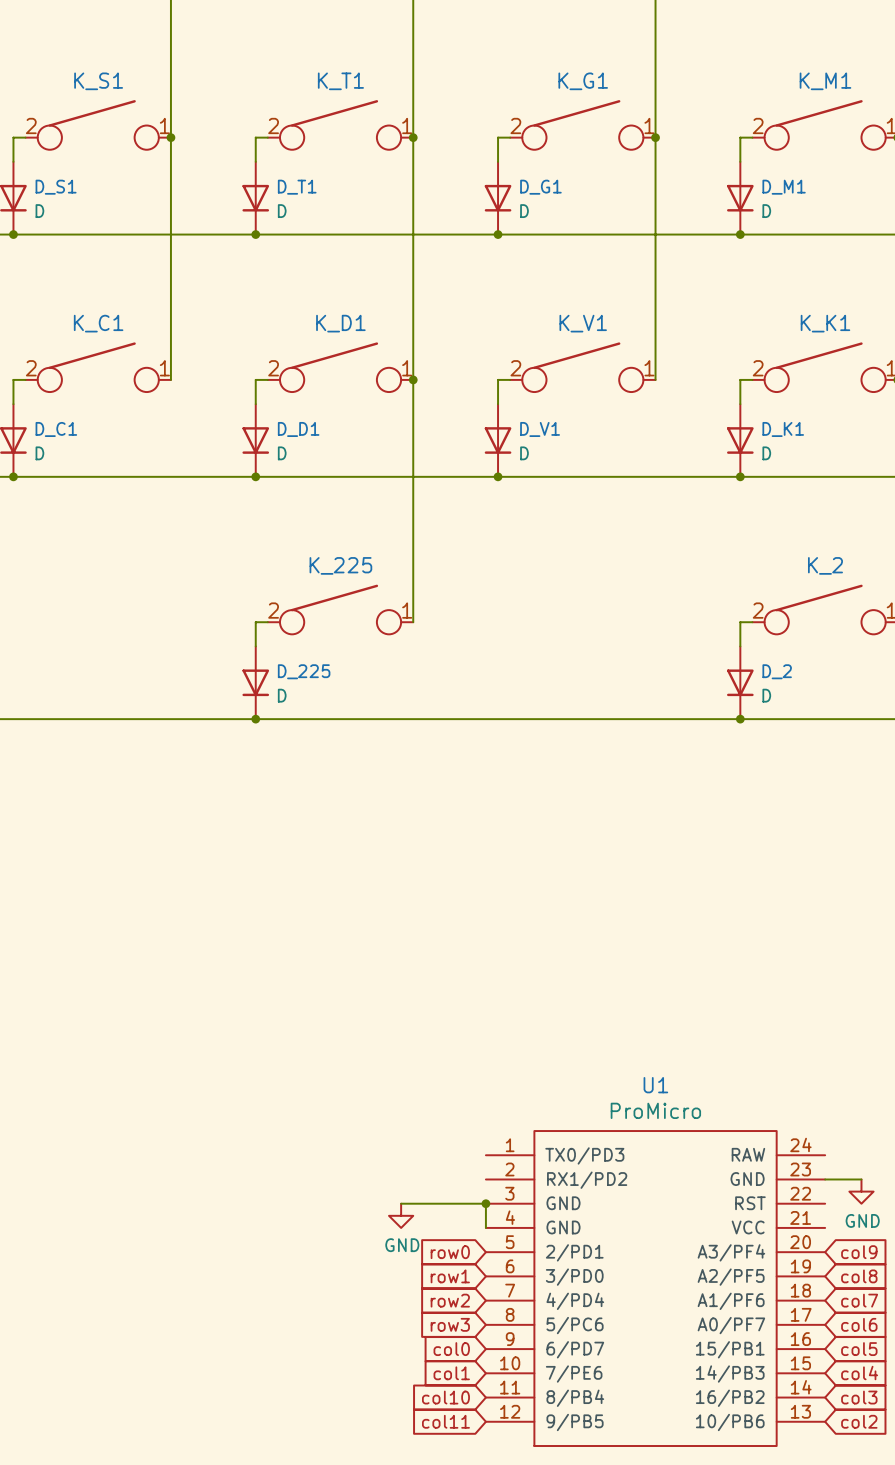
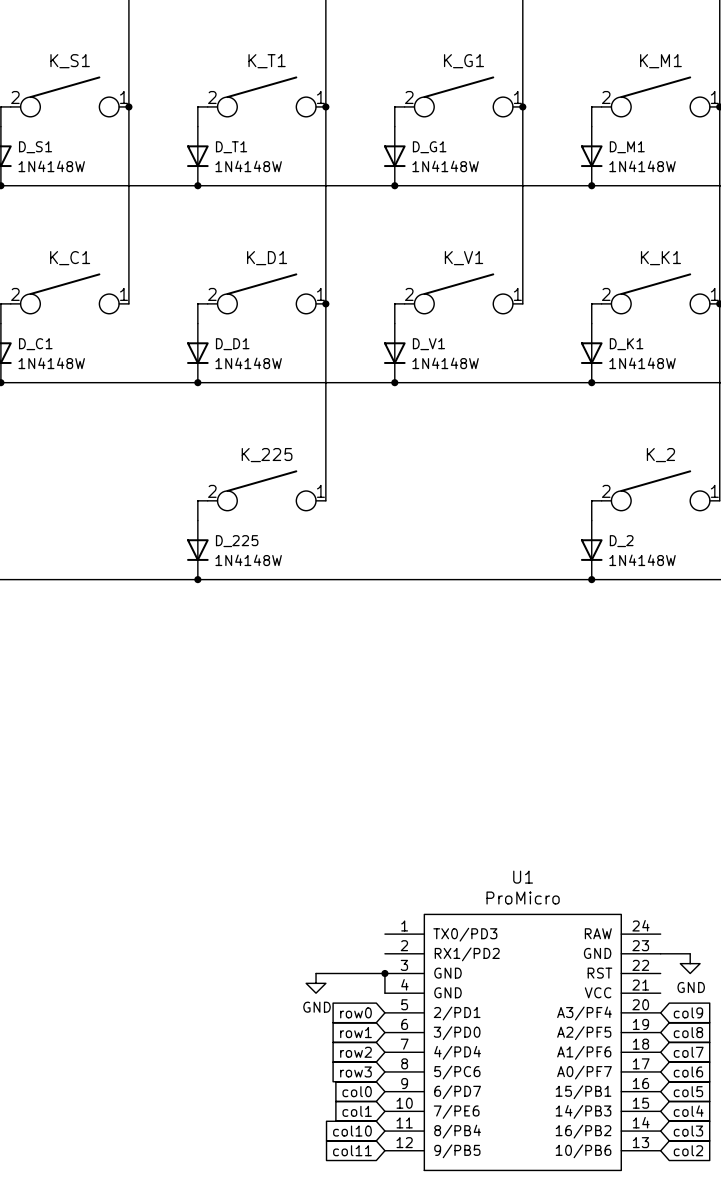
D_S1 value: D (39, 211) -> 1N4148W (51, 166)
D_T1 value: D (282, 211) -> 1N4148W (248, 166)
D_G1 value: D (524, 211) -> 1N4148W (445, 166)
D_M1 value: D (766, 211) -> 1N4148W (642, 166)
D_C1 value: D (39, 453) -> 1N4148W (51, 363)
D_D1 value: D (282, 453) -> 1N4148W (248, 363)
D_V1 value: D (524, 453) -> 1N4148W (445, 363)
D_K1 value: D (766, 453) -> 1N4148W (642, 363)
D_225 value: D (282, 695) -> 1N4148W (248, 560)
D_2 value: D (766, 695) -> 1N4148W (642, 560)

